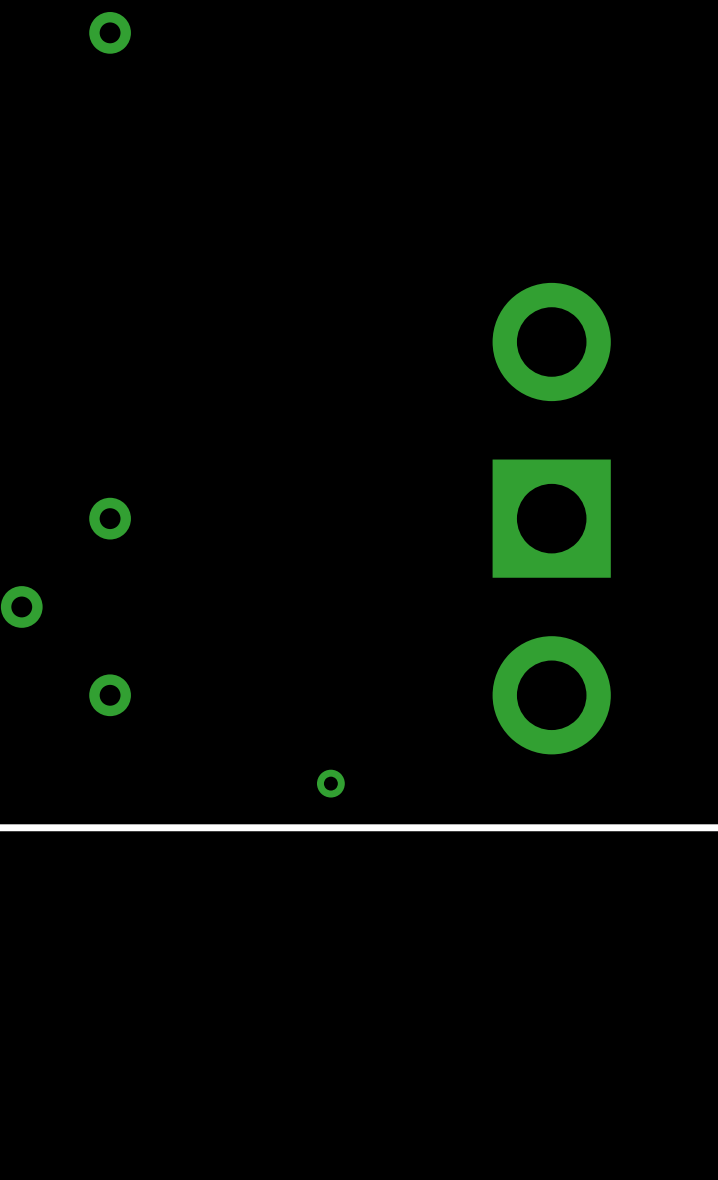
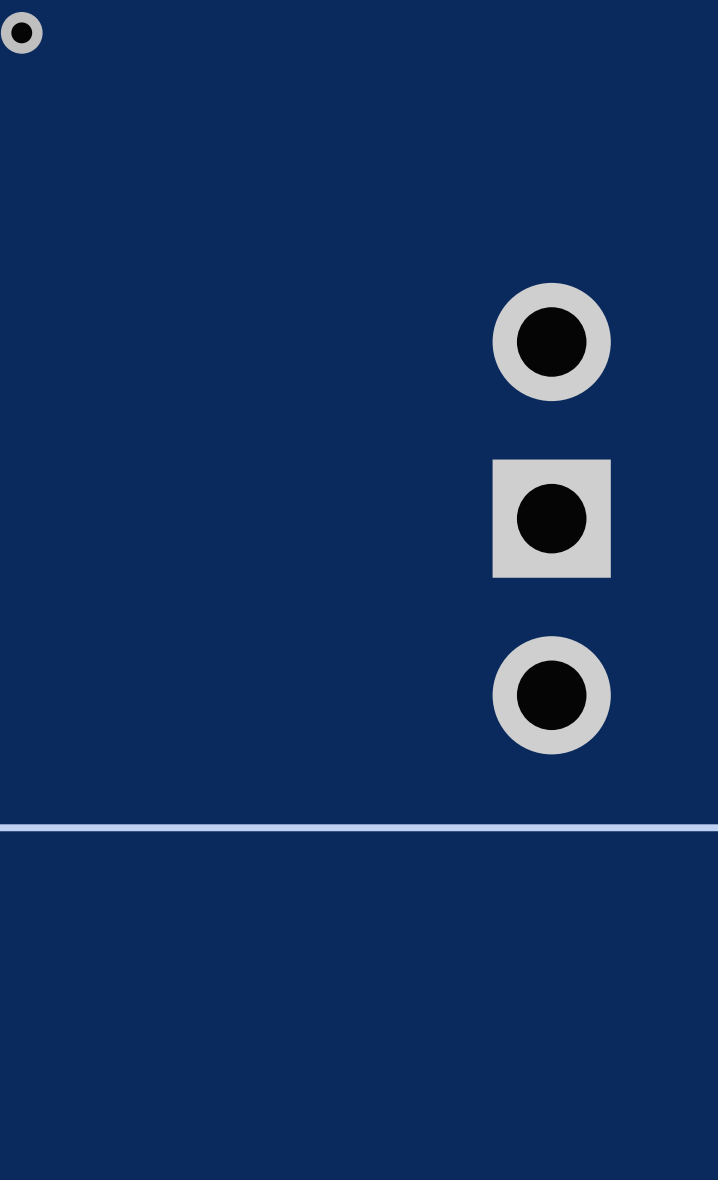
via: none -> (21, 32)
via: (110, 32) -> none
via: (110, 518) -> none
via: (21, 606) -> none
via: (110, 695) -> none
via: (330, 783) -> none

